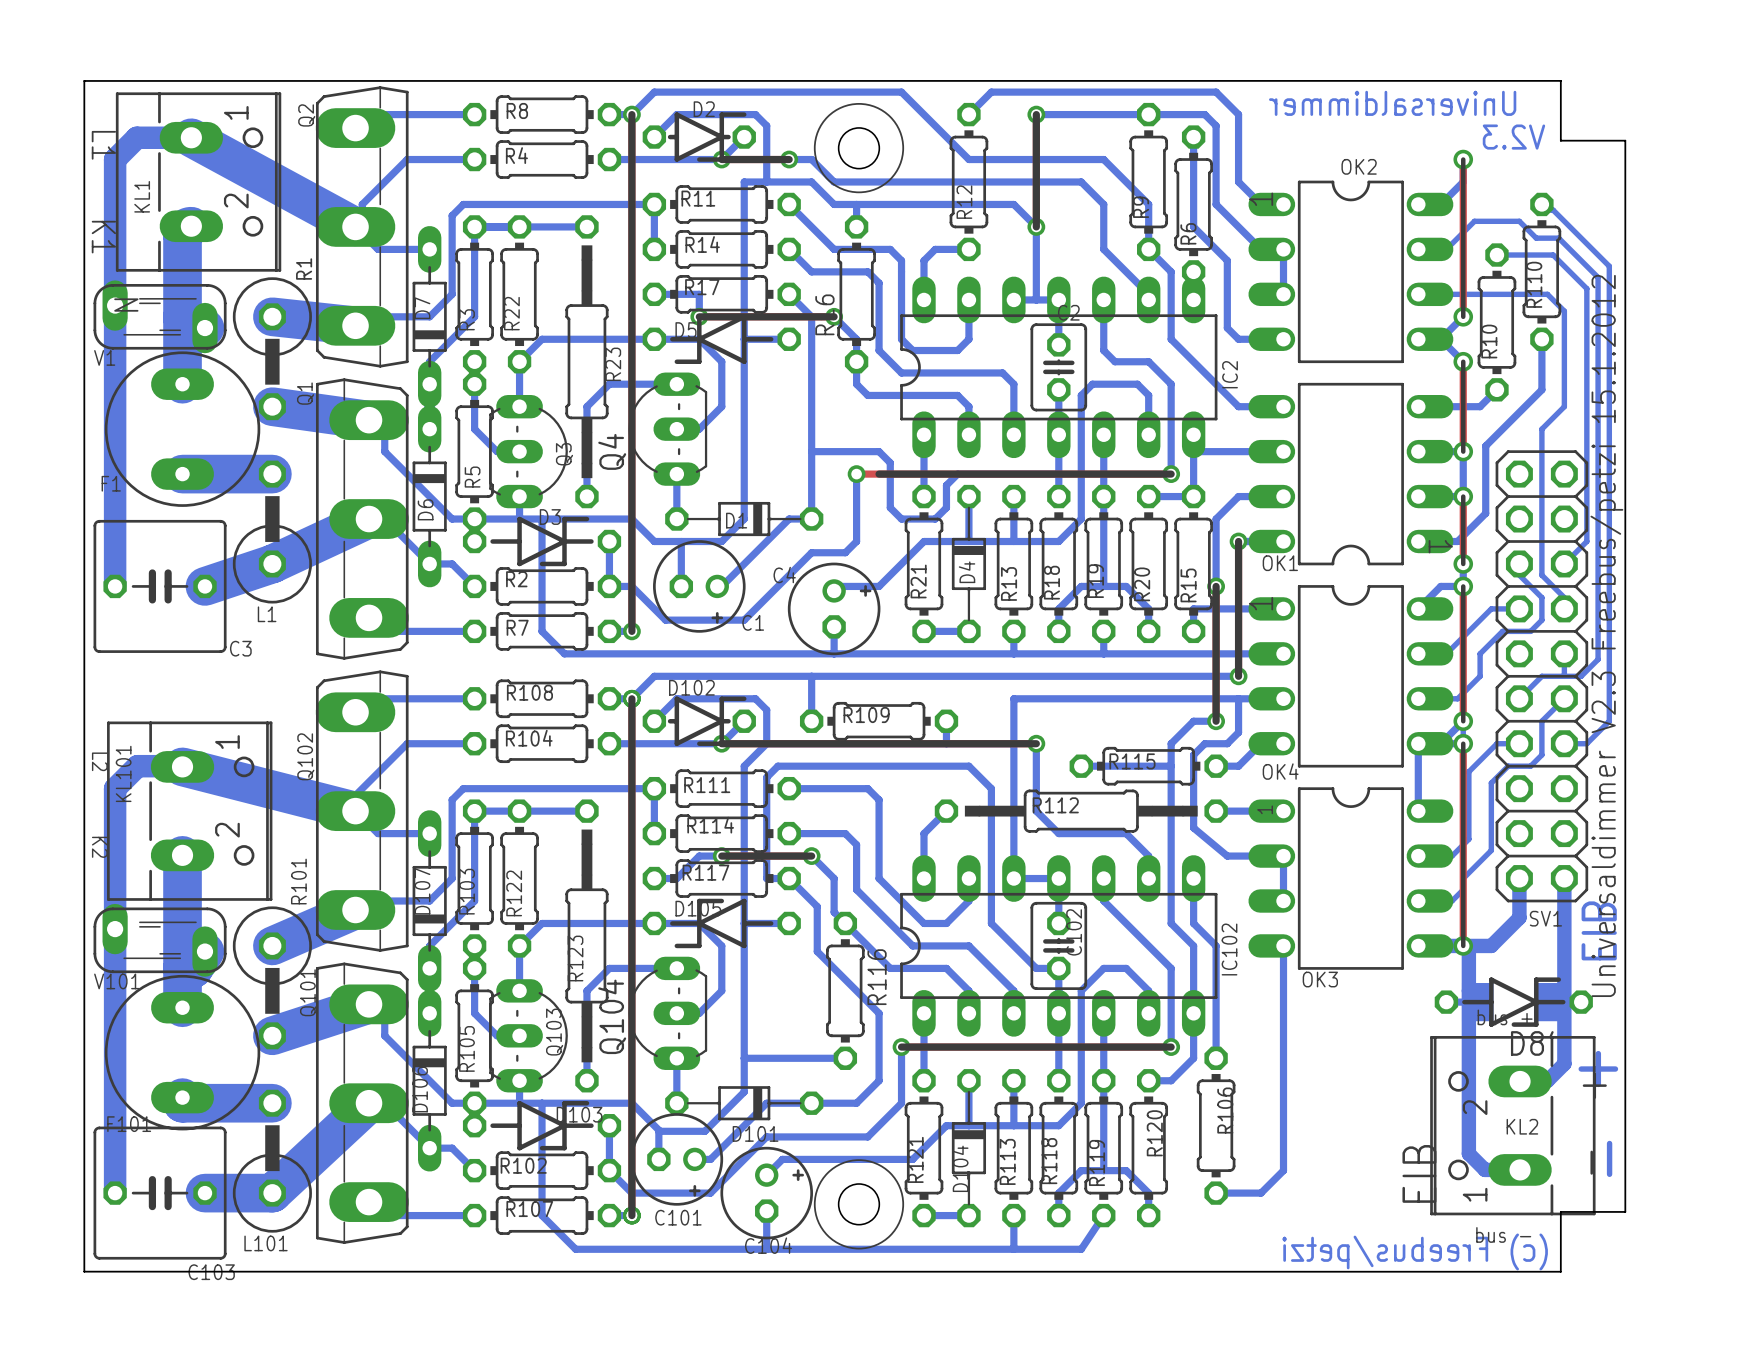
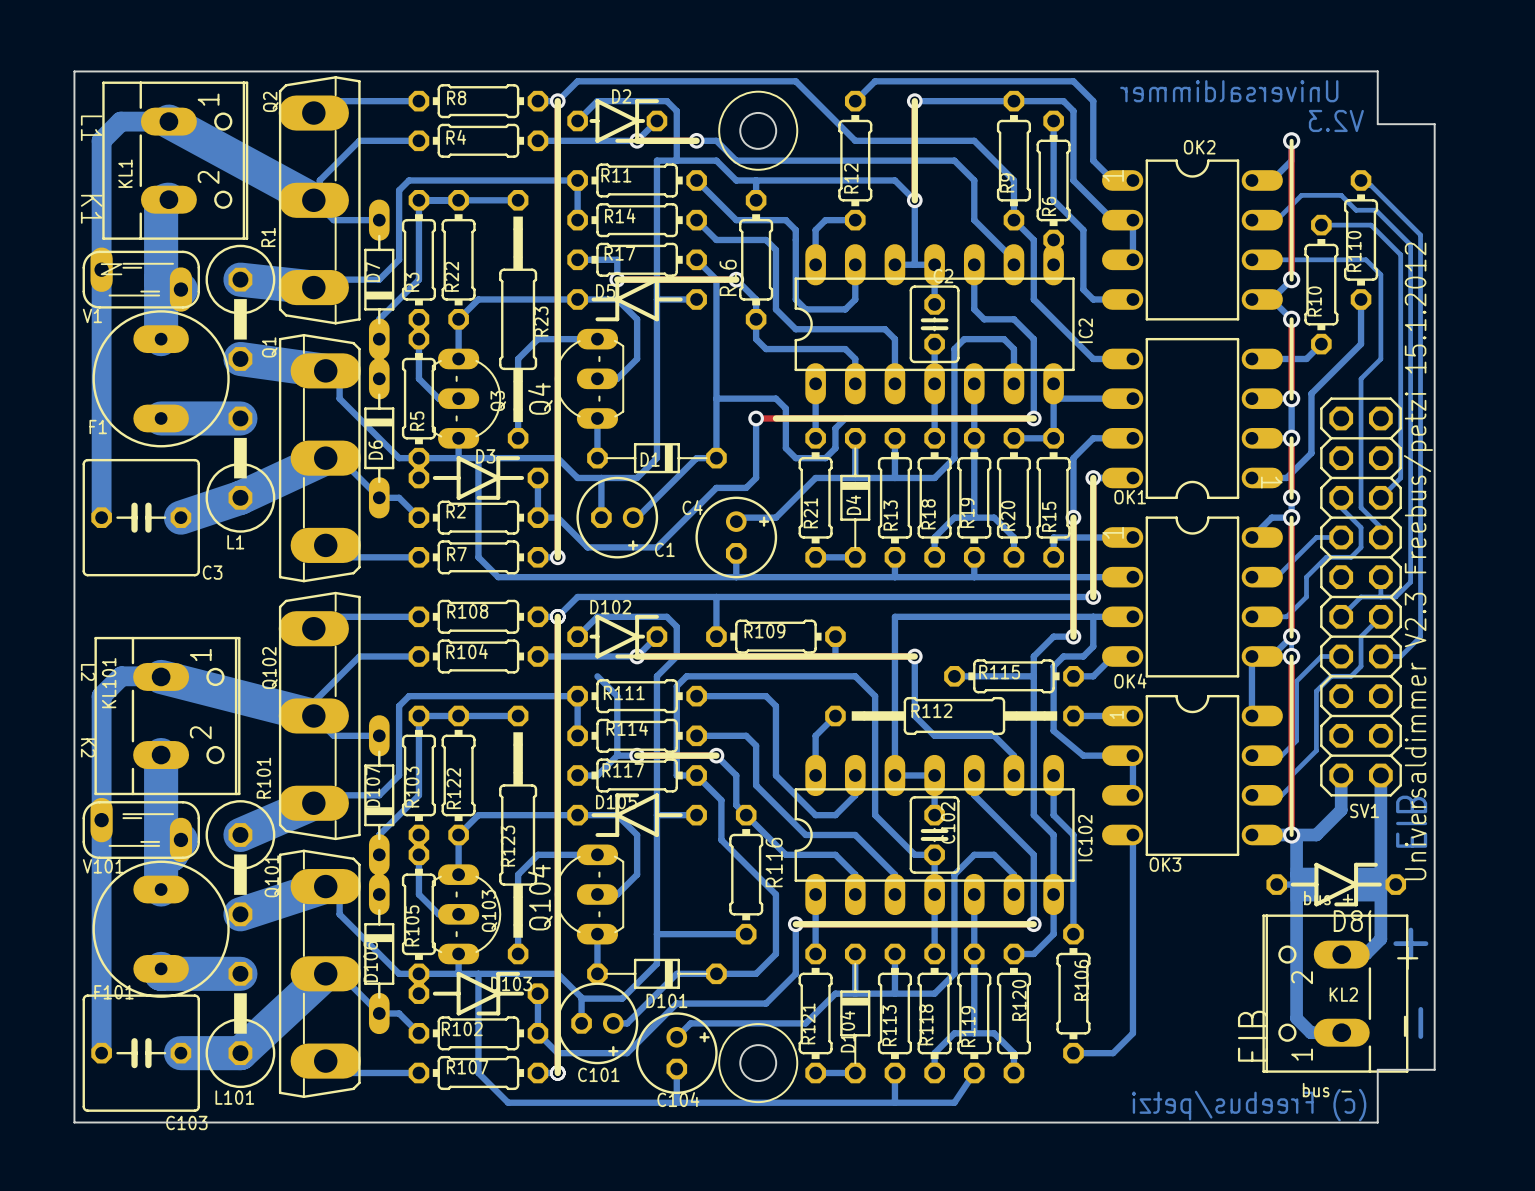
bottom track: none -> (597, 676) (617, 696) (617, 755)

